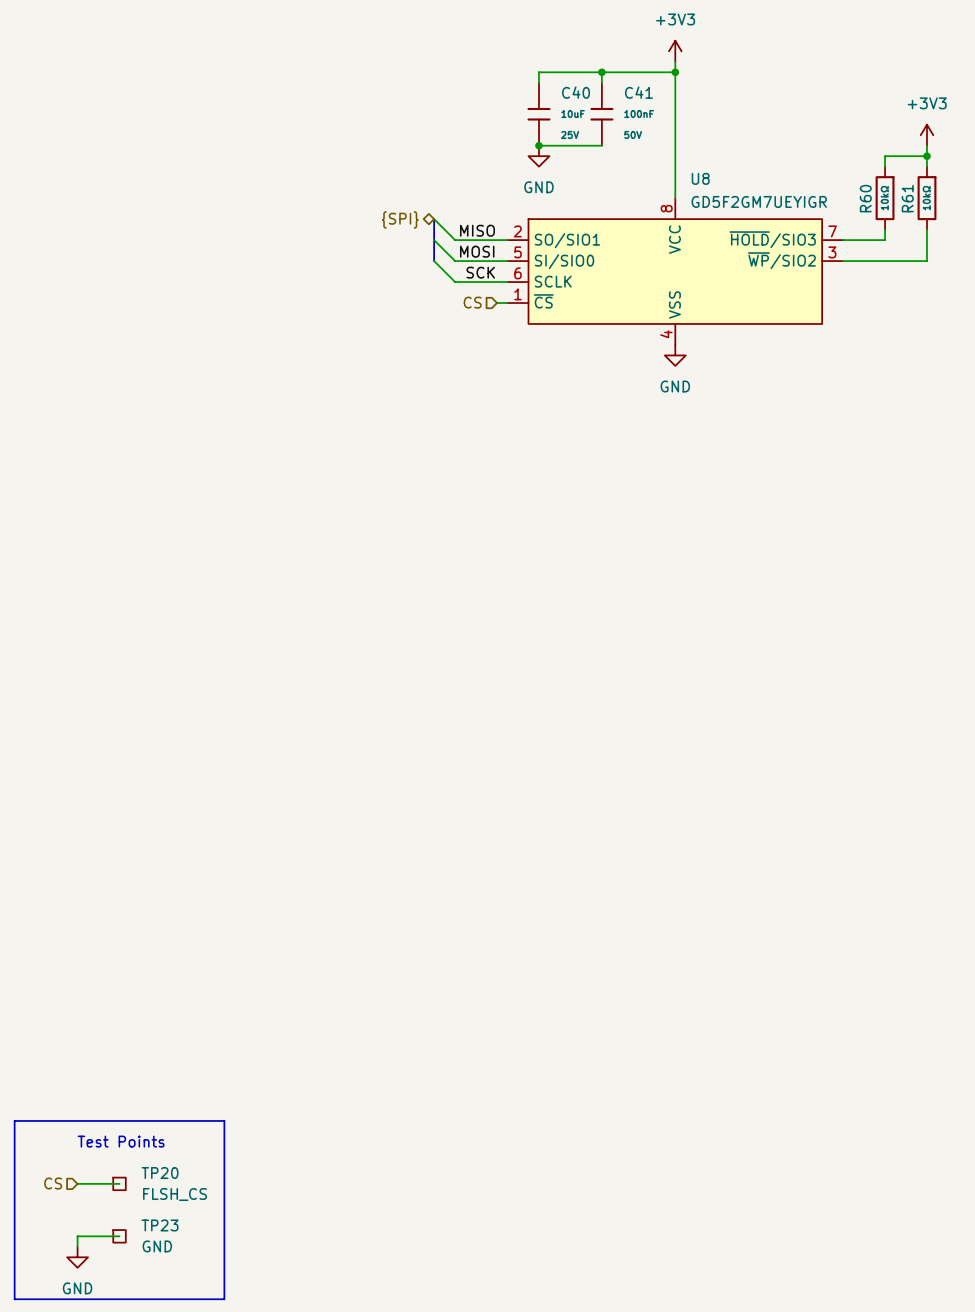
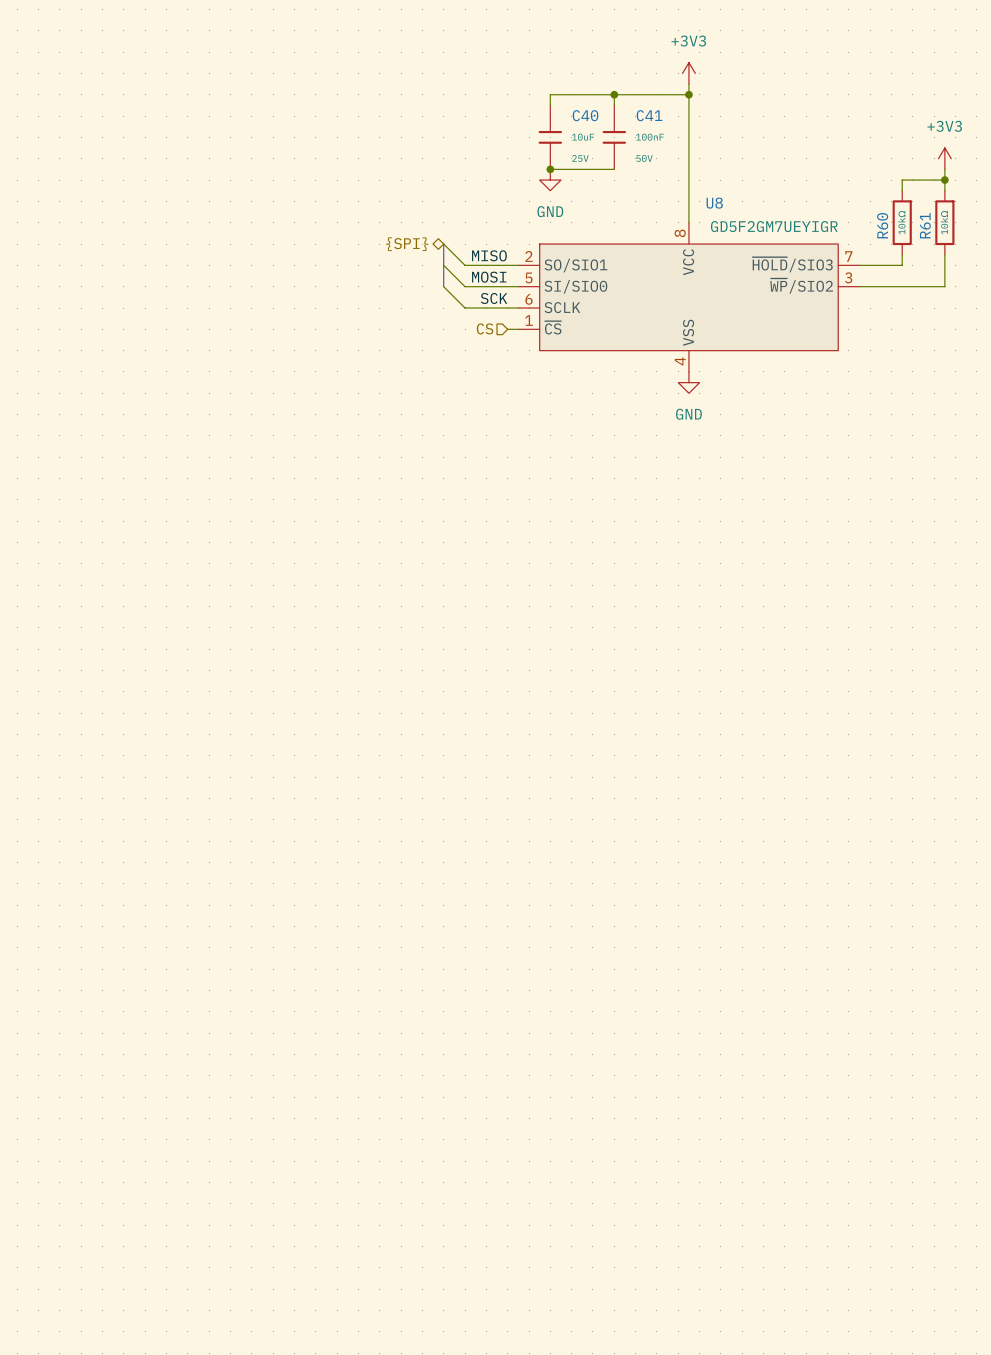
line: (14, 1120) (224, 1120) (224, 1299) (14, 1299) (14, 1120) -> none
text: Test Points (121, 1141) -> none
hierarchical label: CS (53, 1183) -> none
wire: (77, 1183) (119, 1183) -> none
TP20: FLSH_CS (119, 1183) -> none
wire: (119, 1236) (77, 1236) (77, 1246) -> none
TP23: GND (119, 1236) -> none
power symbol: GND (77, 1257) -> none

